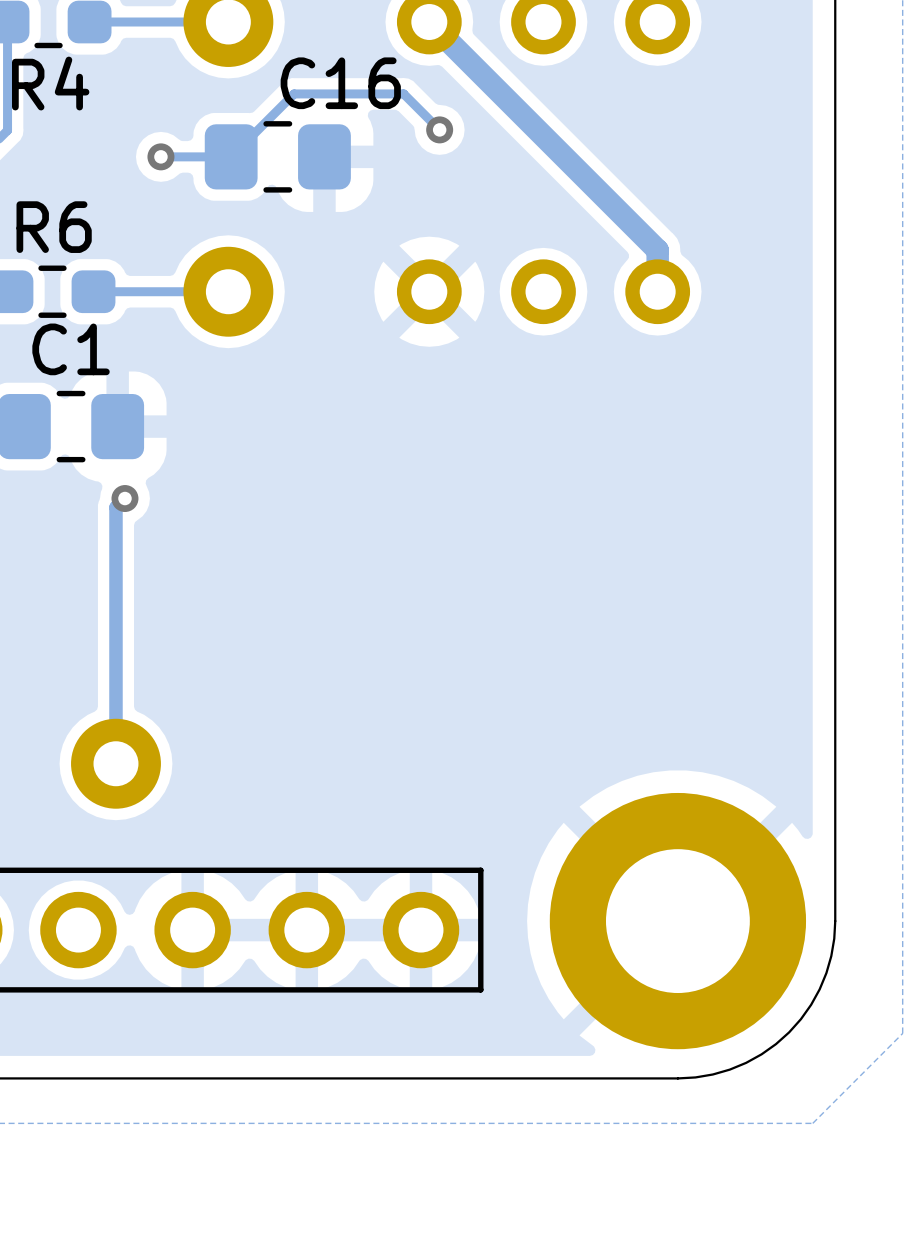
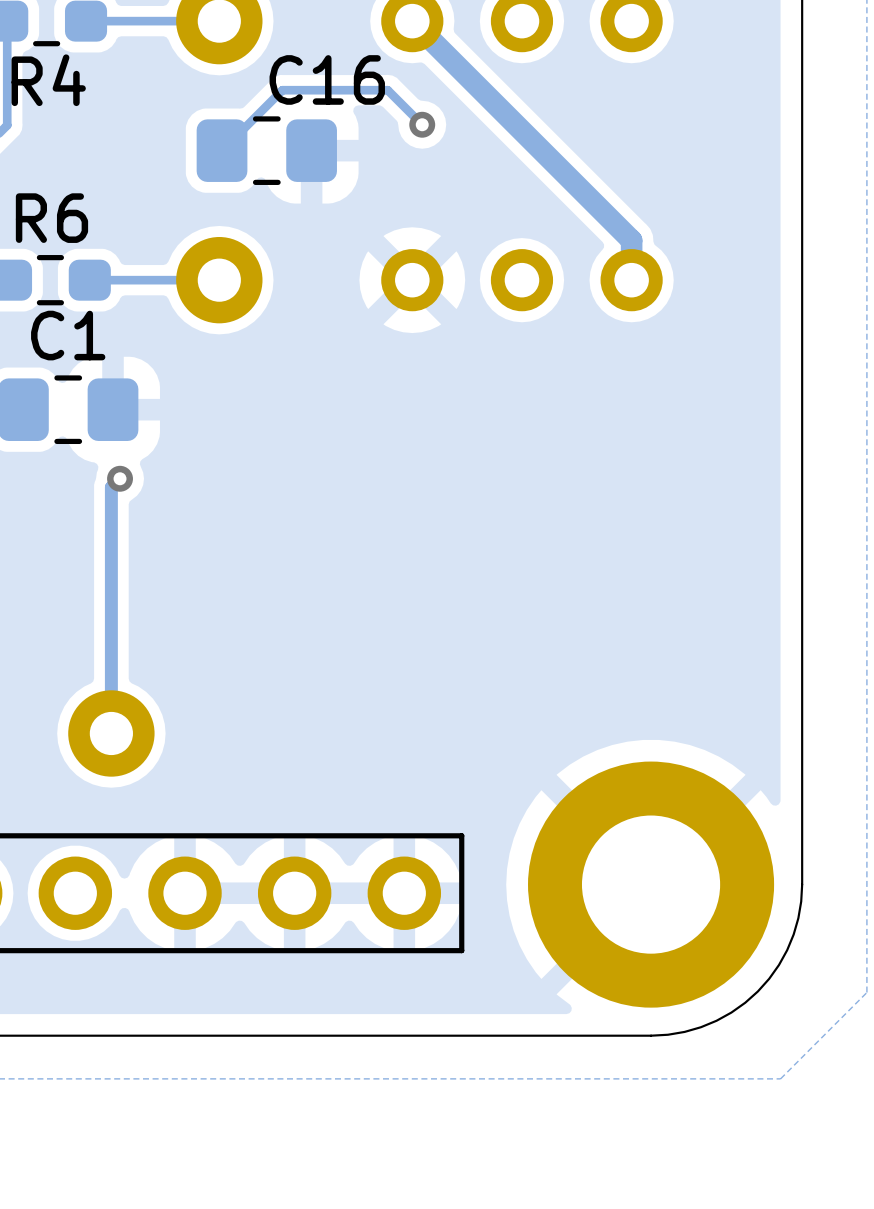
via: (160, 156) -> none
track: (226, 156) (160, 156) -> none

